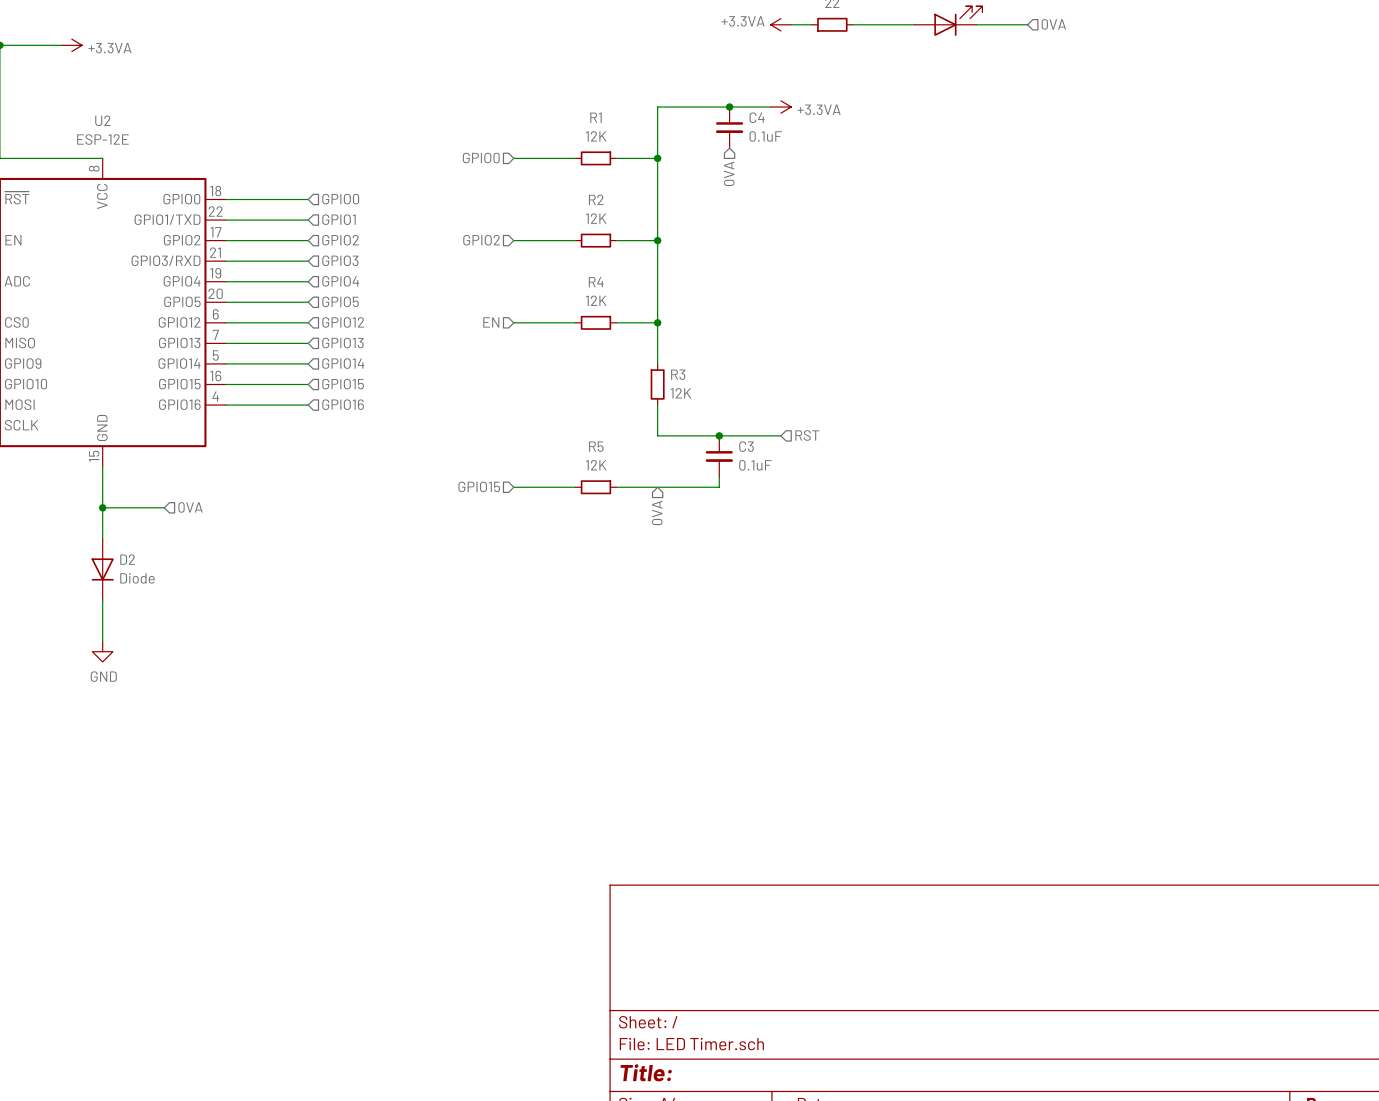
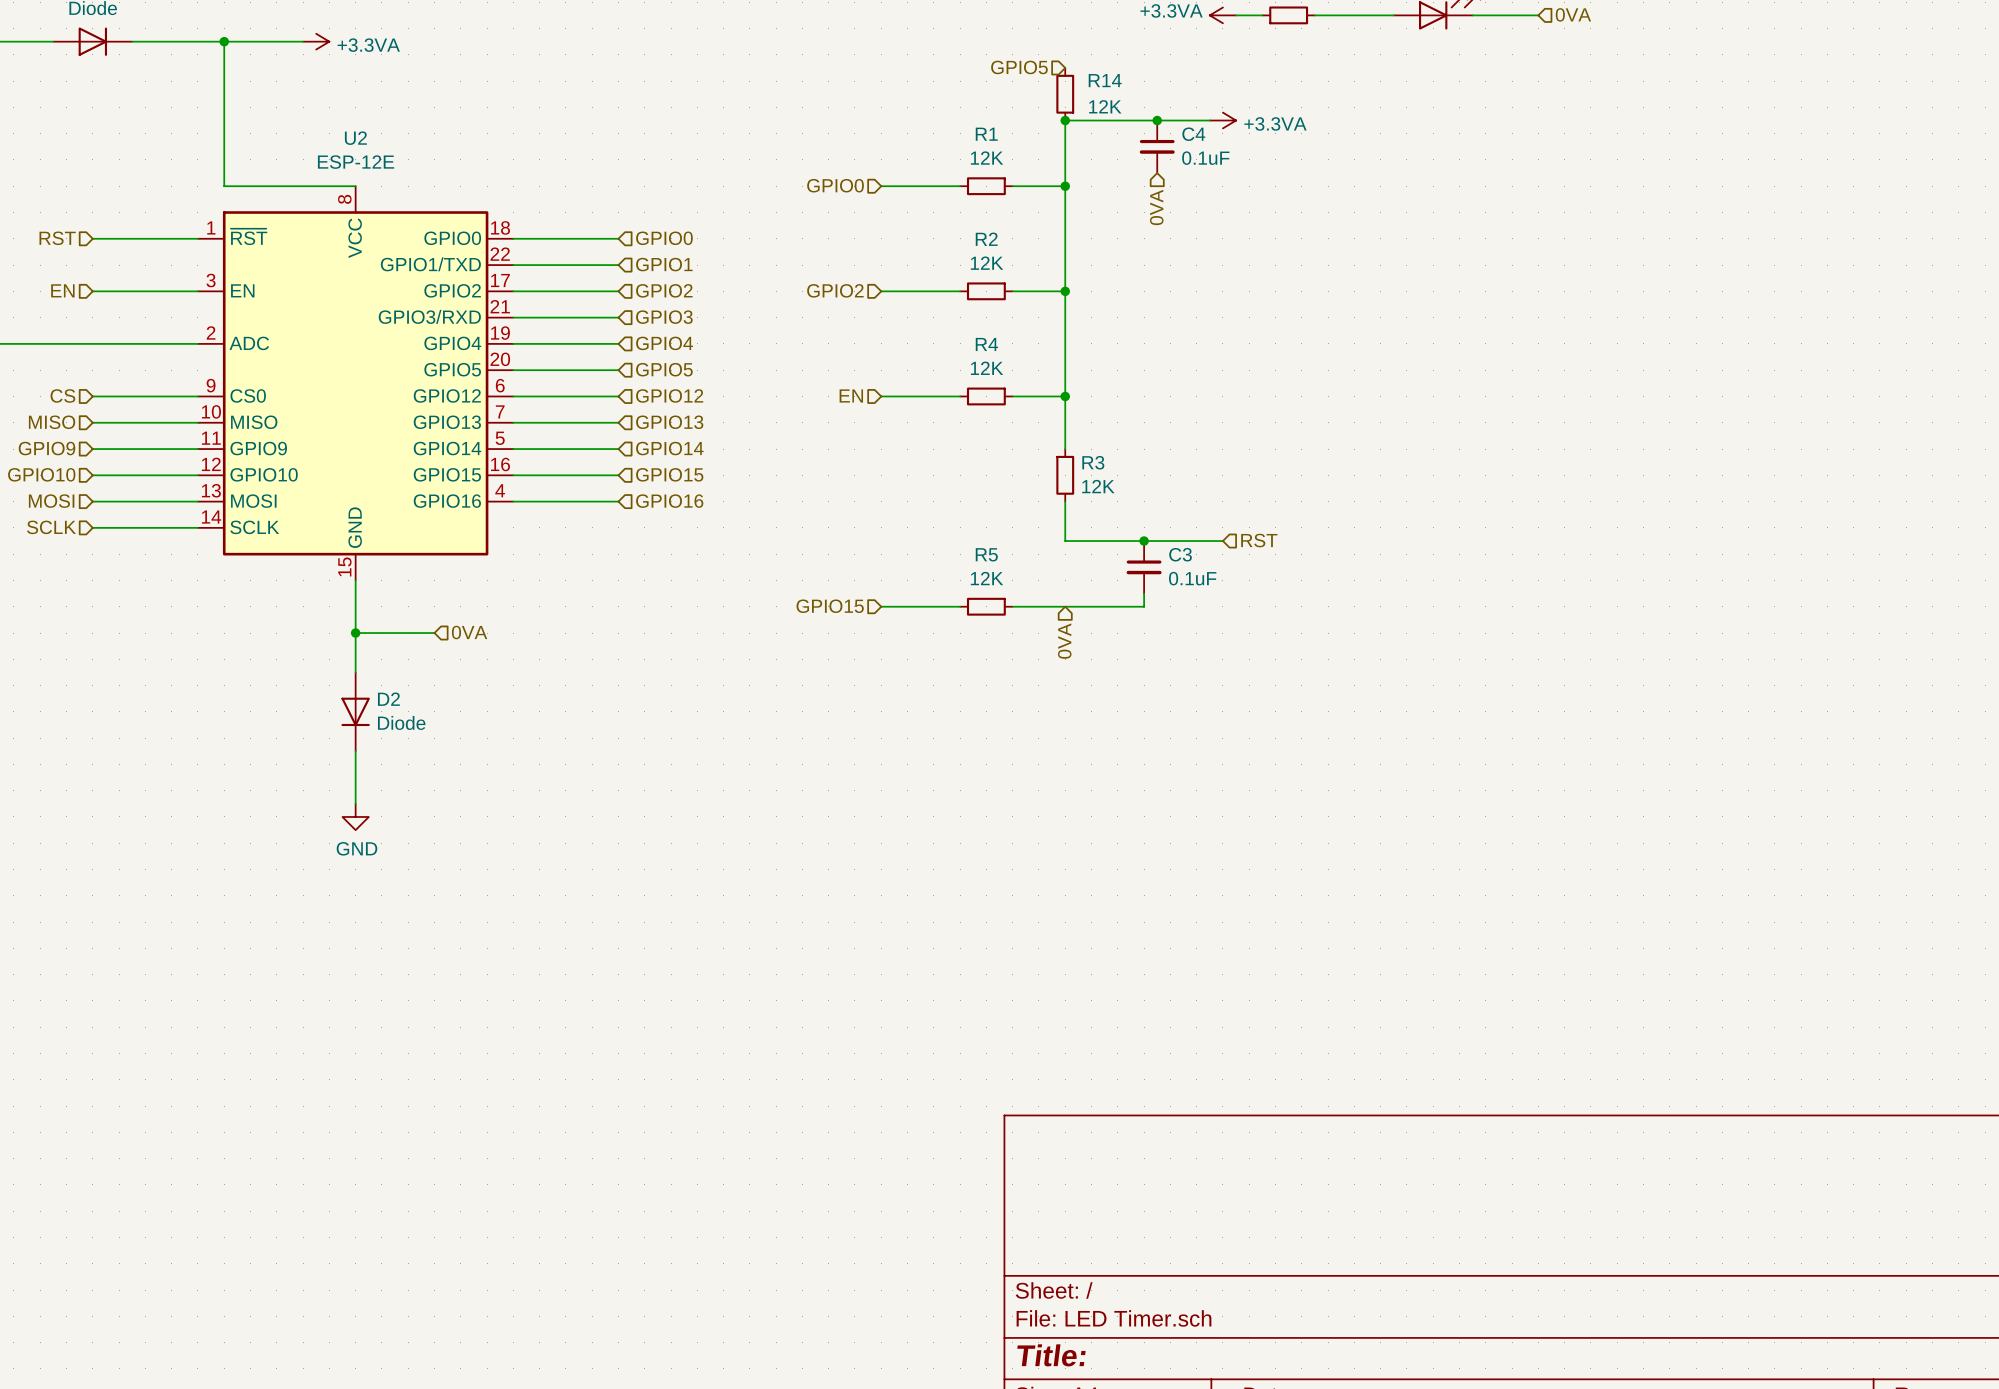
hierarchical label: none -> GPIO5 (1019, 67)
R14: none -> 12K (1065, 94)
junction: none -> (1065, 120)

